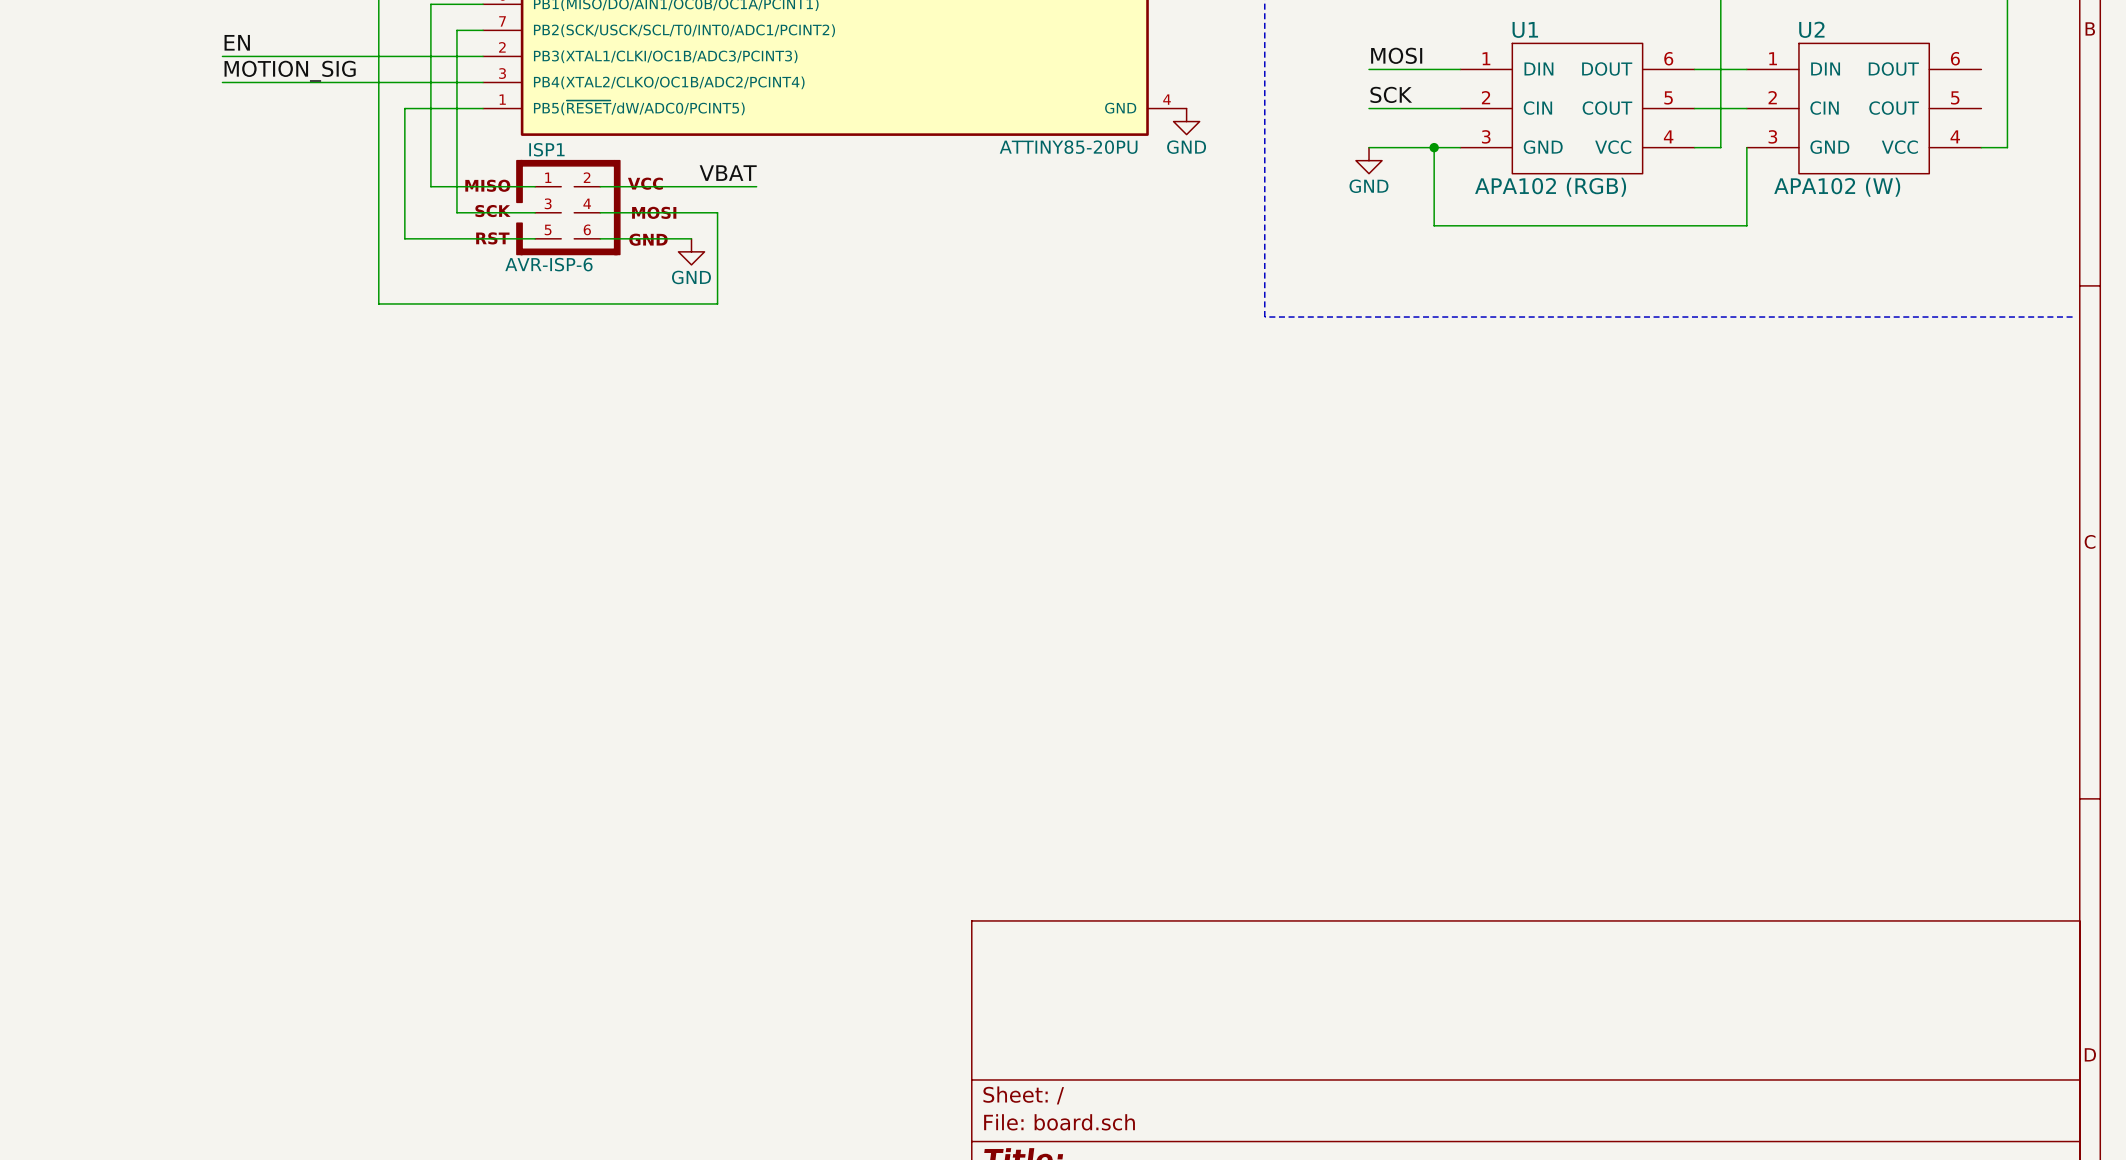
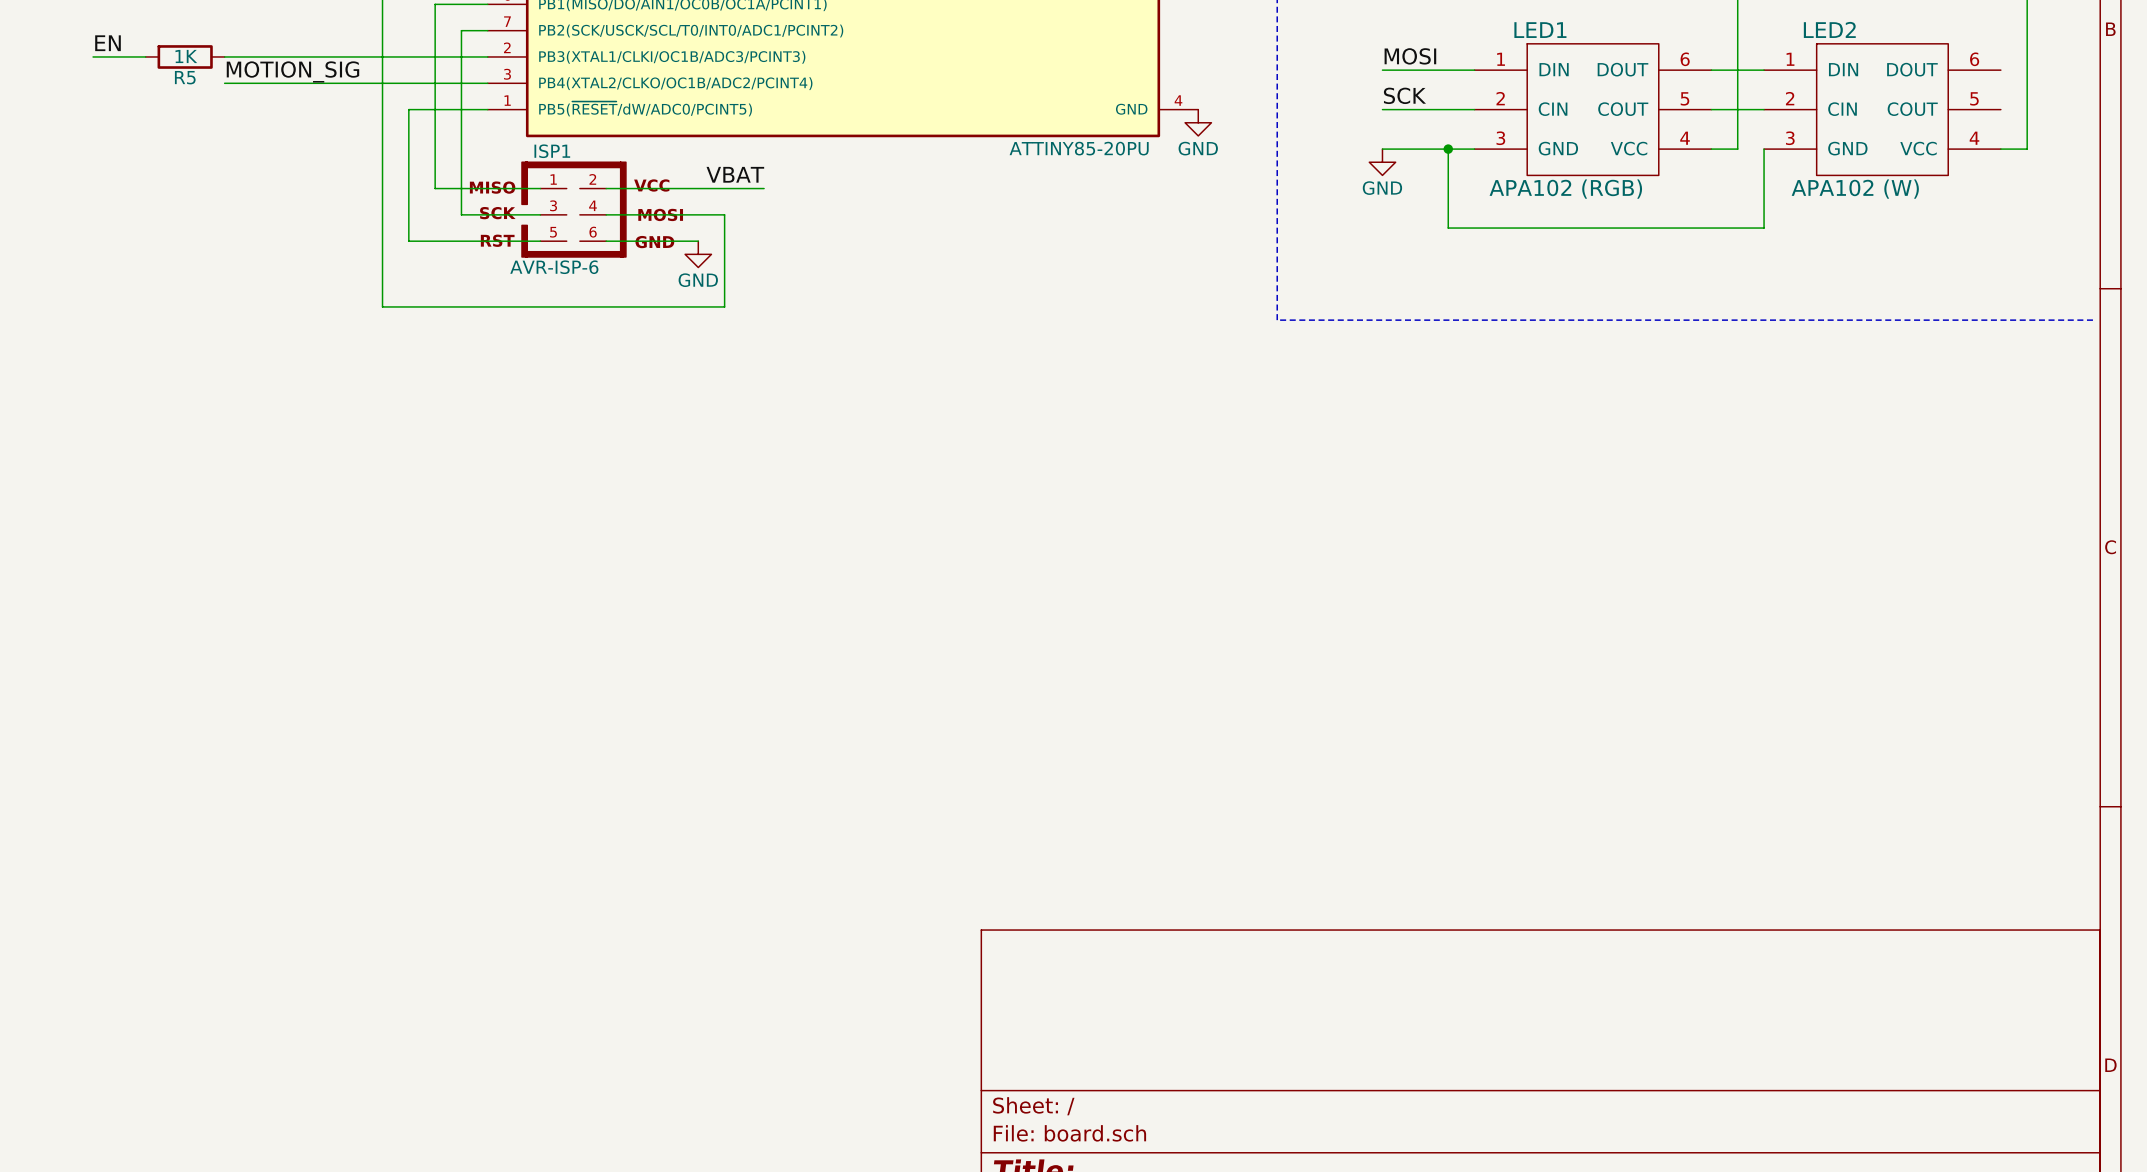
U1 name: U1 (1525, 29) -> LED1 (1540, 30)
U2 name: U2 (1811, 29) -> LED2 (1829, 29)
label position: EN (237, 42) -> EN (108, 43)
wire: none -> (93, 56) (145, 56)
R5: none -> 1K (185, 56)

